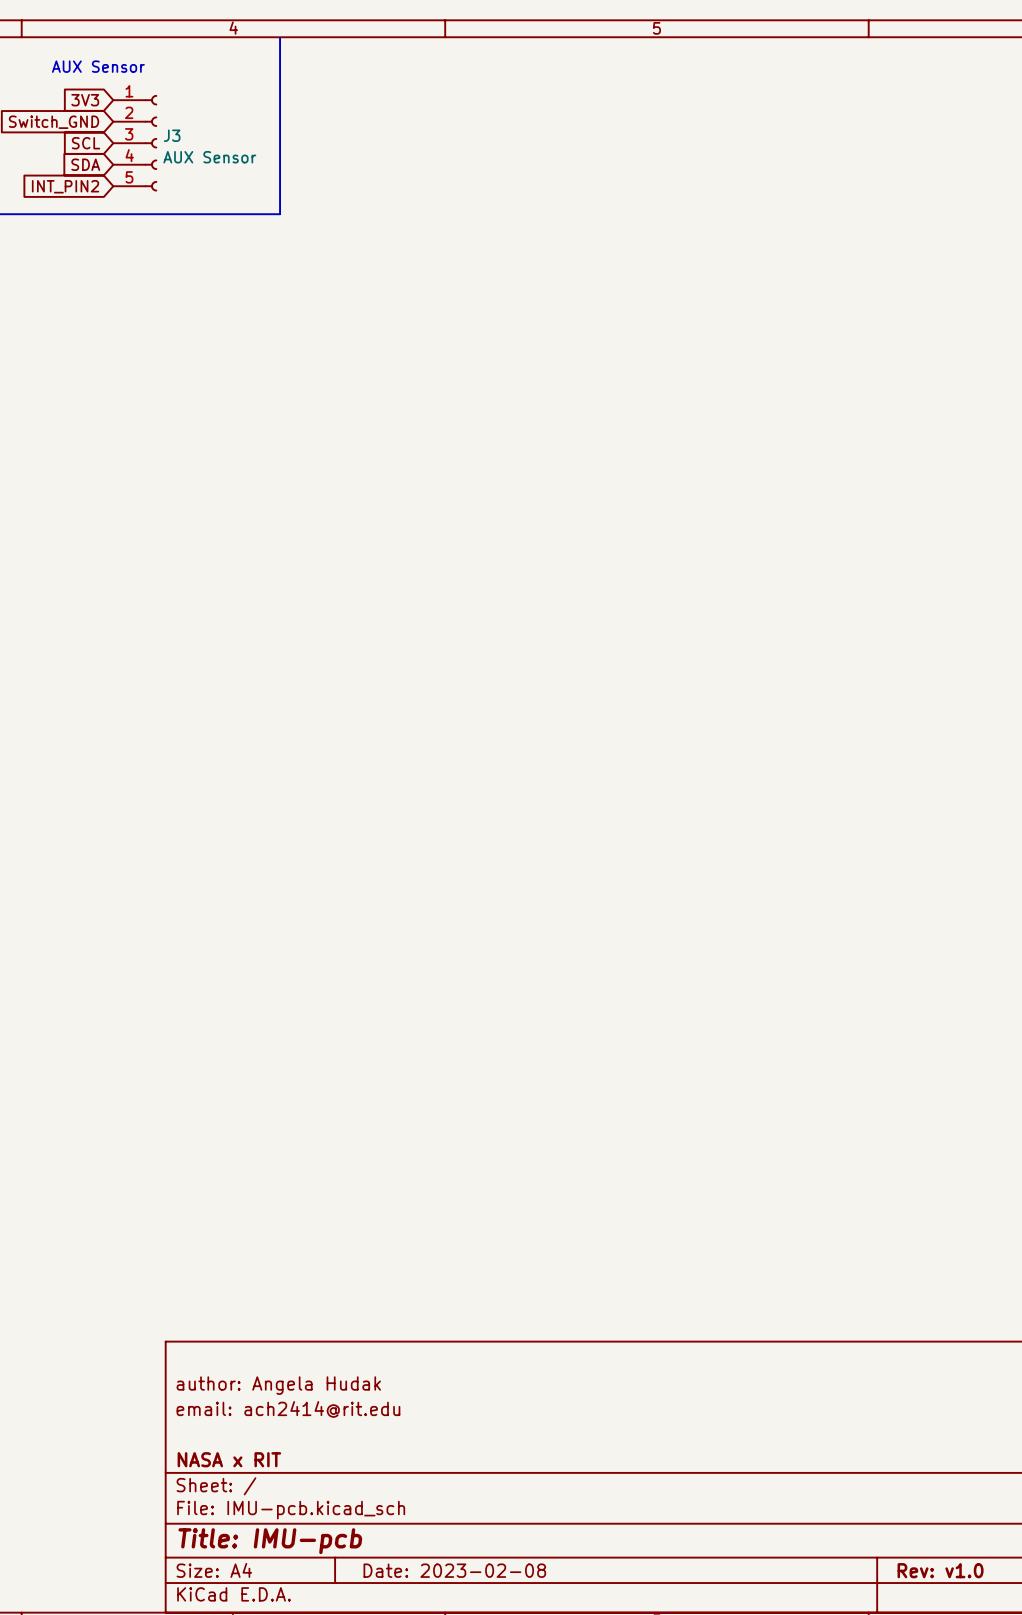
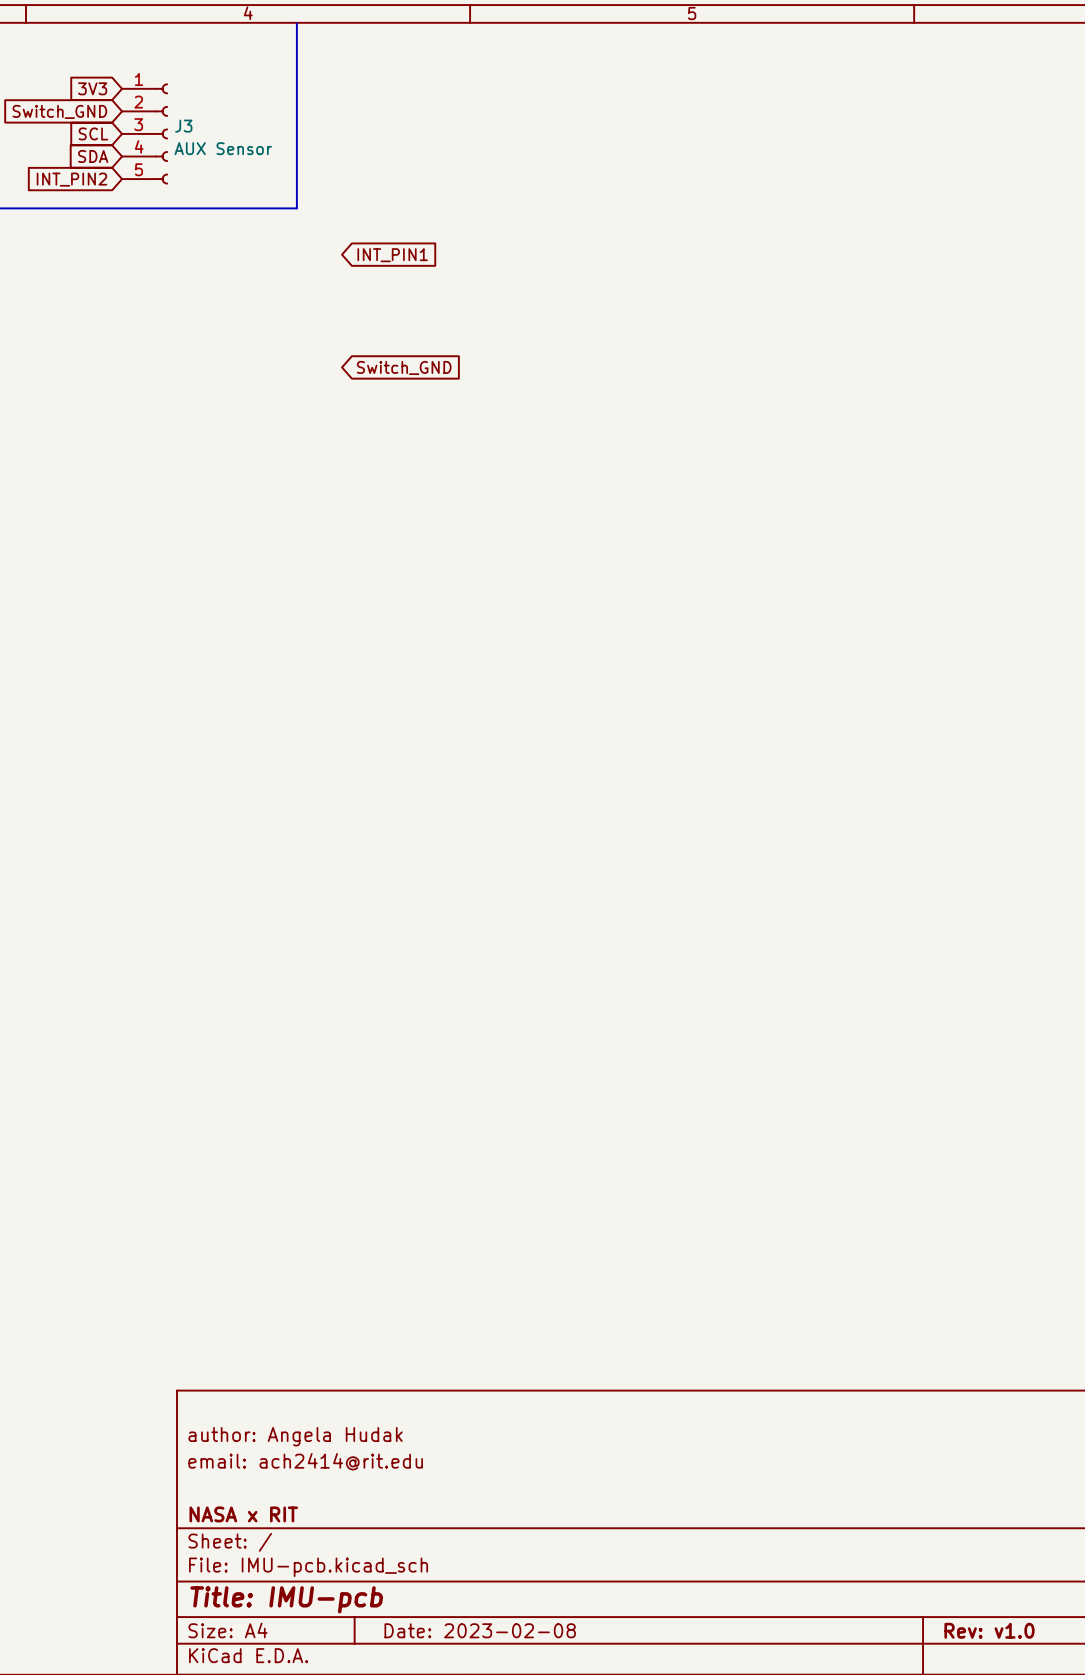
text: AUX Sensor (98, 66) -> none
global label: none -> INT_PIN1 (392, 255)
global label: none -> Switch_GND (404, 367)

